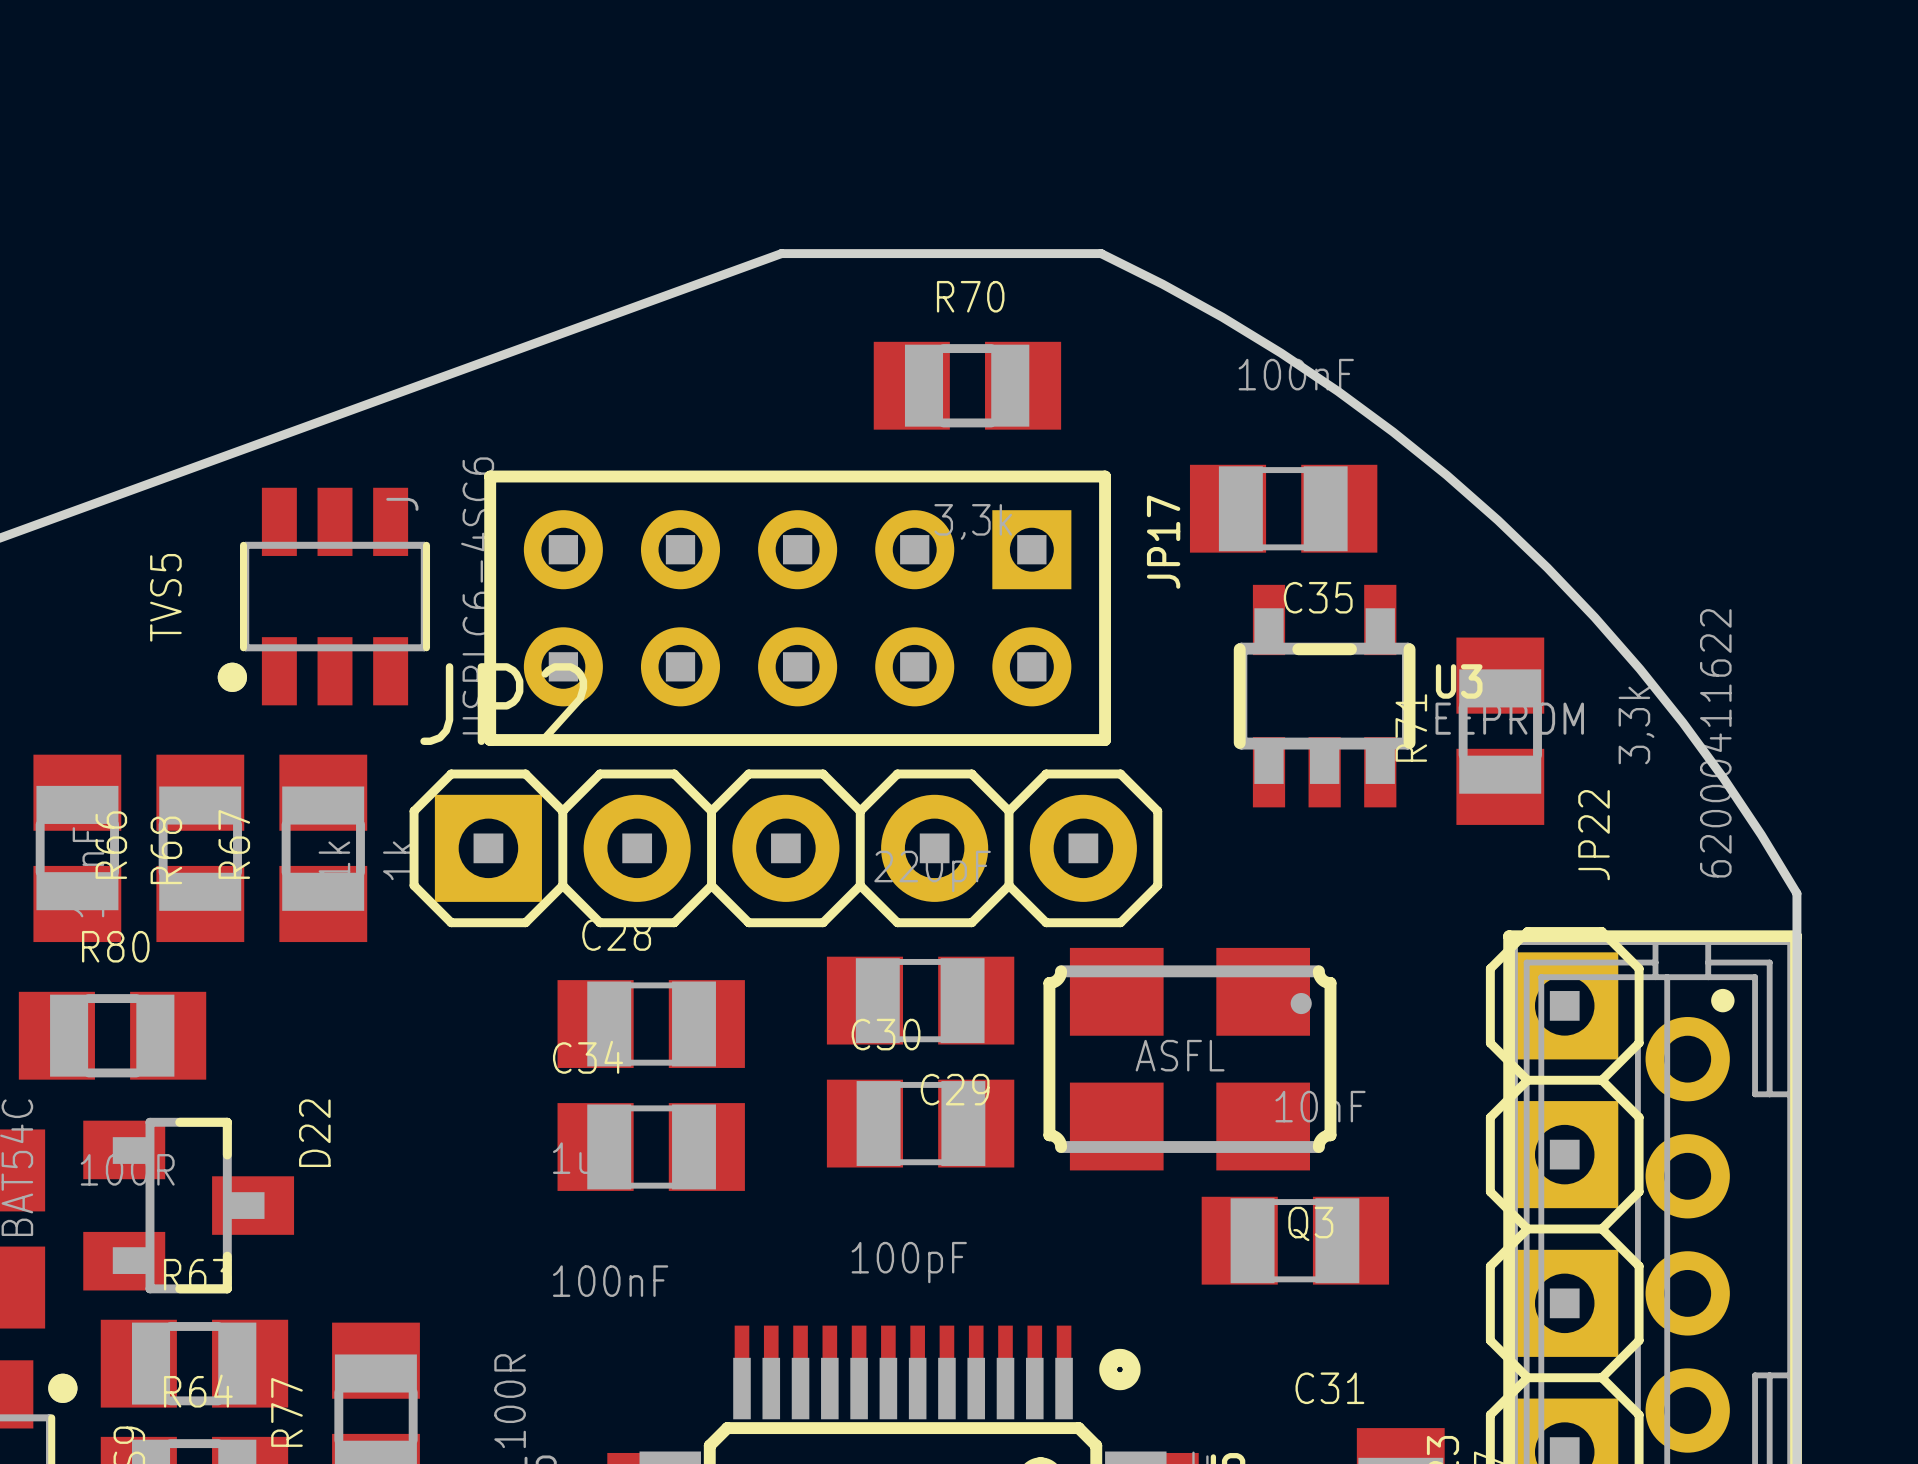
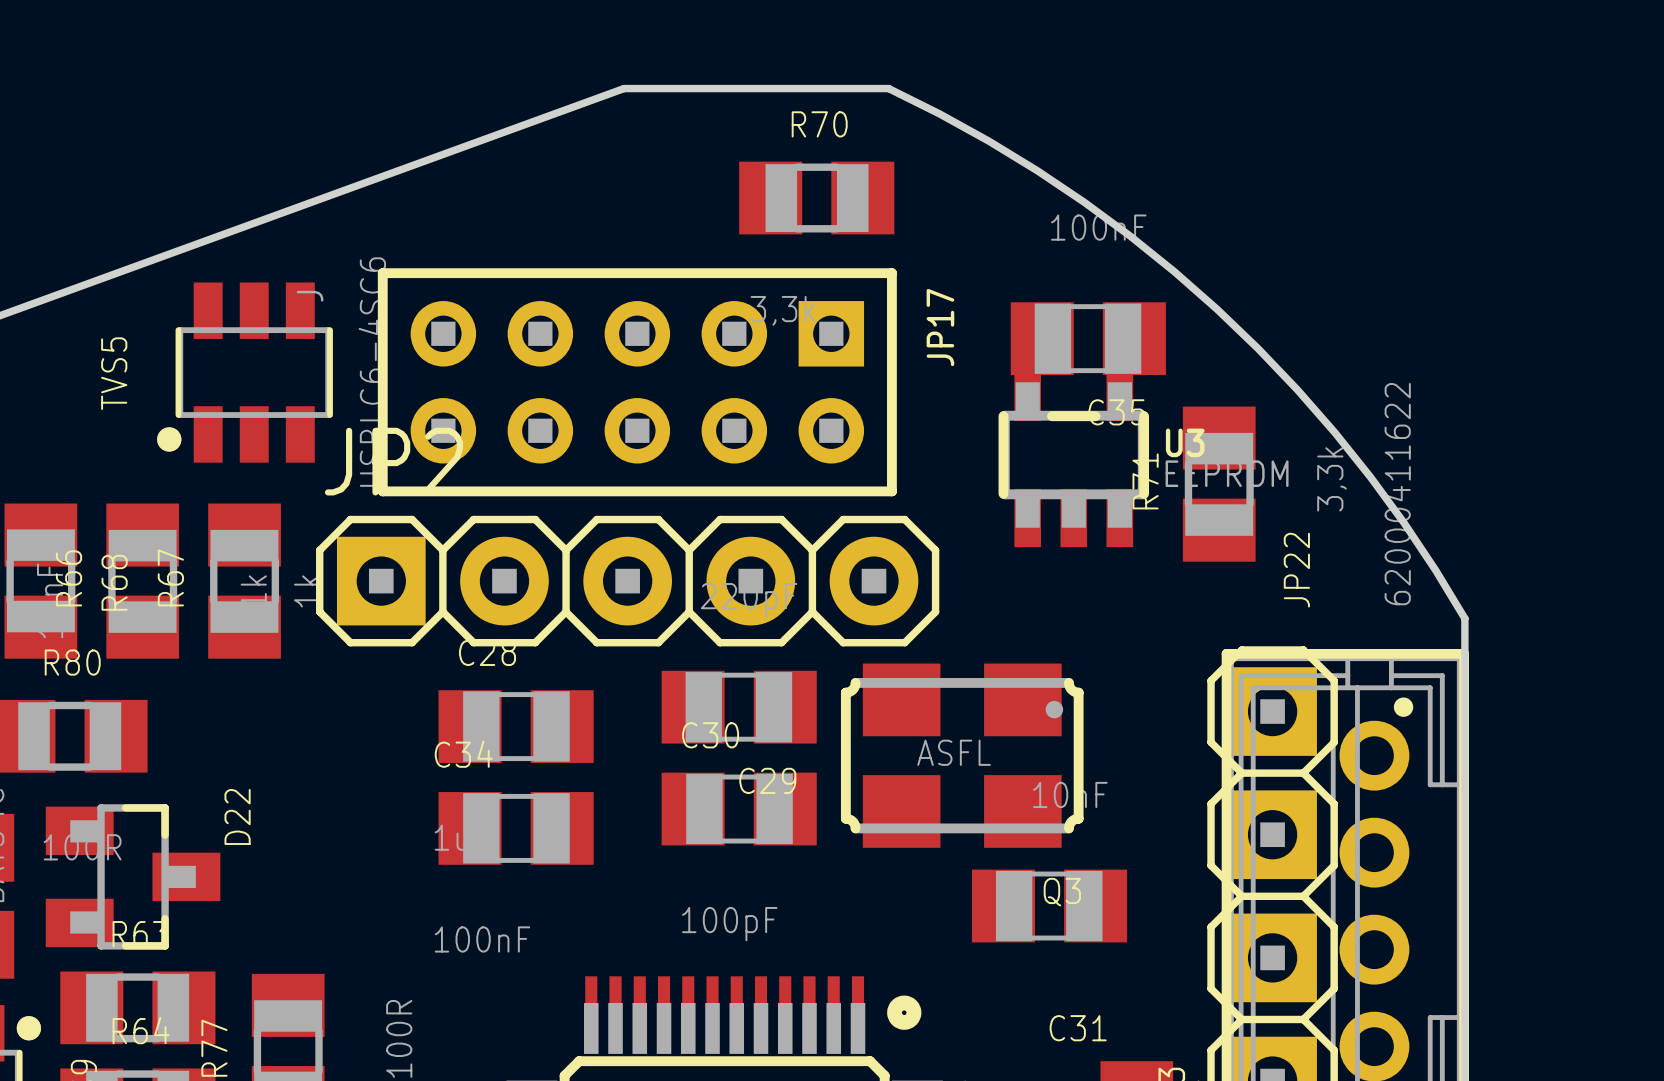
R70 position: (967, 385) -> (816, 198)
C35 position: (1283, 508) -> (1088, 338)

